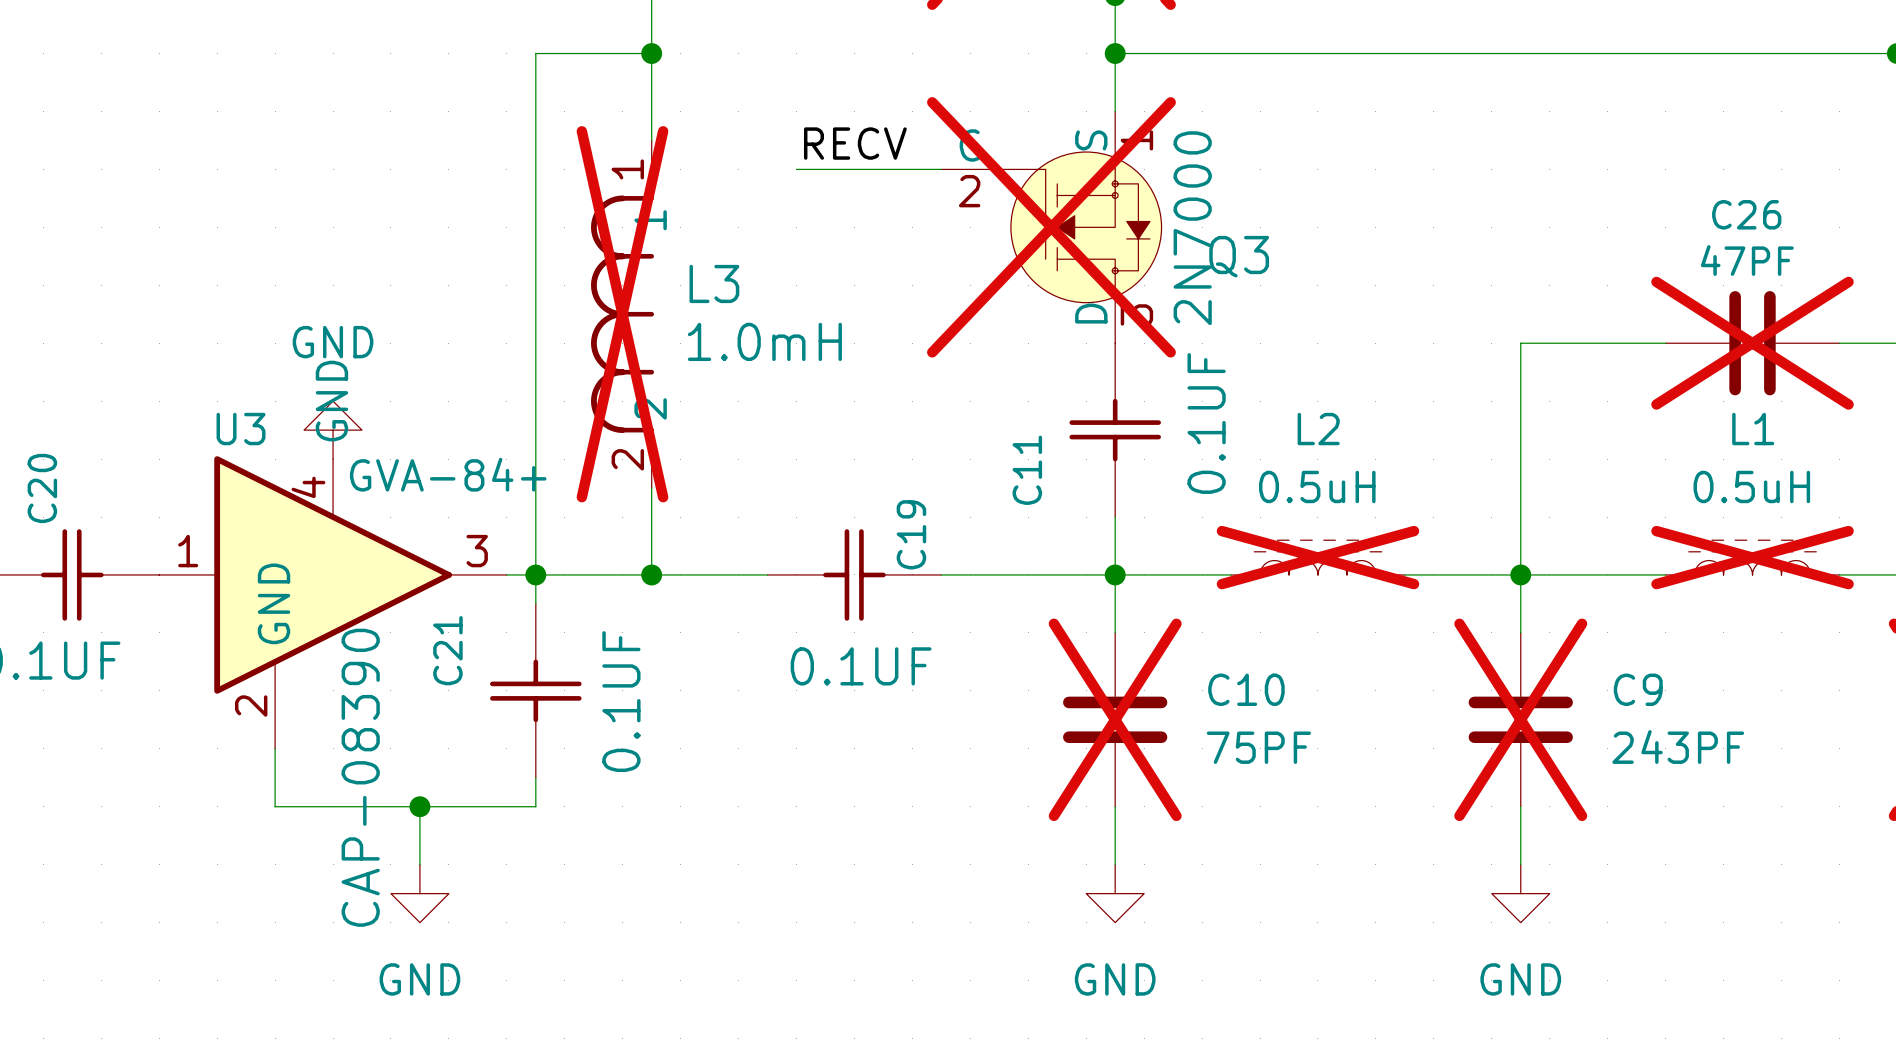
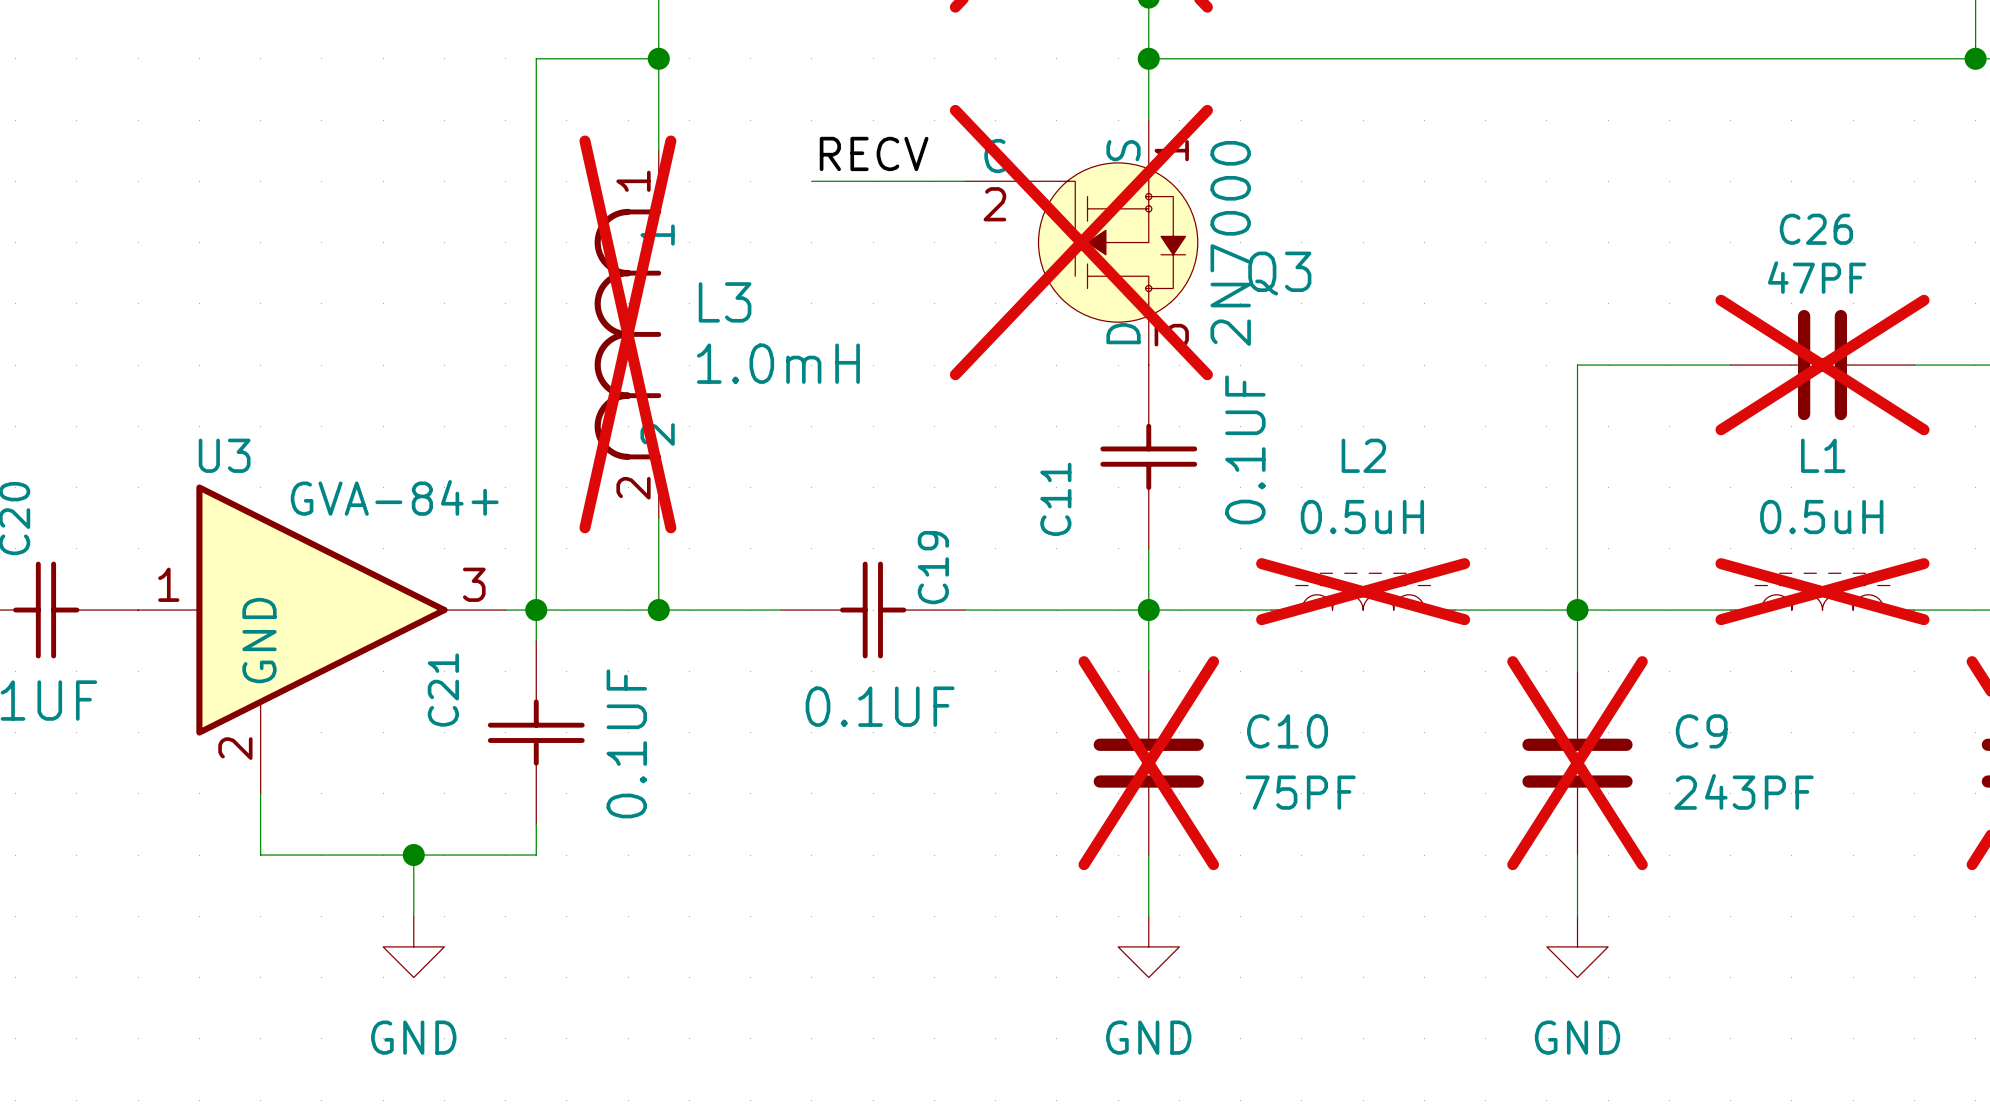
power symbol: GND (333, 430) -> none
U3 symbol: [159, 456, 507, 749] -> [138, 484, 506, 794]
U3 value position: GVA-84+ (448, 474) -> GVA-84+ (394, 497)
C21 text: CAP-08390 (360, 777) -> none

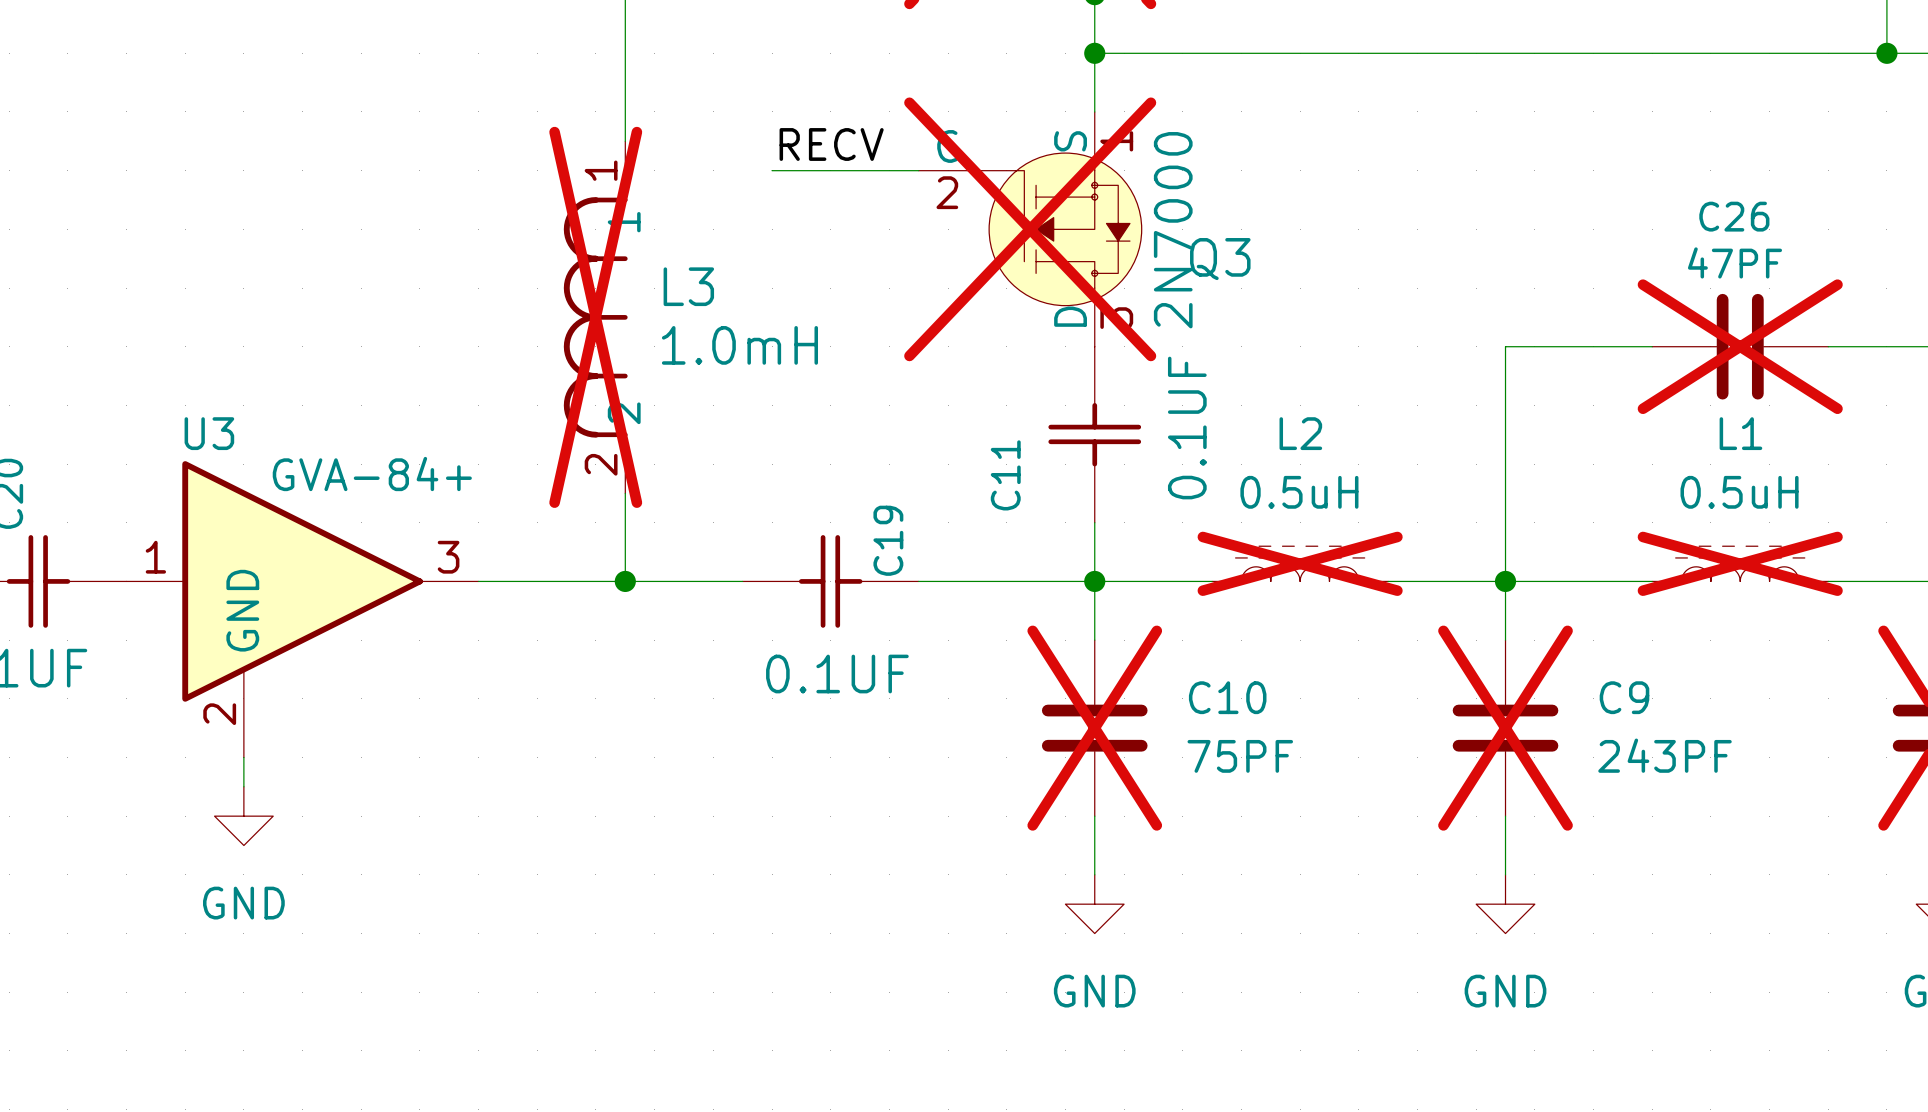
wire: (658, 58) (536, 58) (536, 640) -> none
junction: (658, 58) -> none
junction: (536, 610) -> none
C21: 0.1UF (536, 732) -> none
wire: (260, 824) (260, 855) (536, 855) (536, 824) -> none
wire: (413, 855) (413, 916) -> none
junction: (413, 855) -> none
power symbol position: GND (413, 946) -> GND (243, 816)

